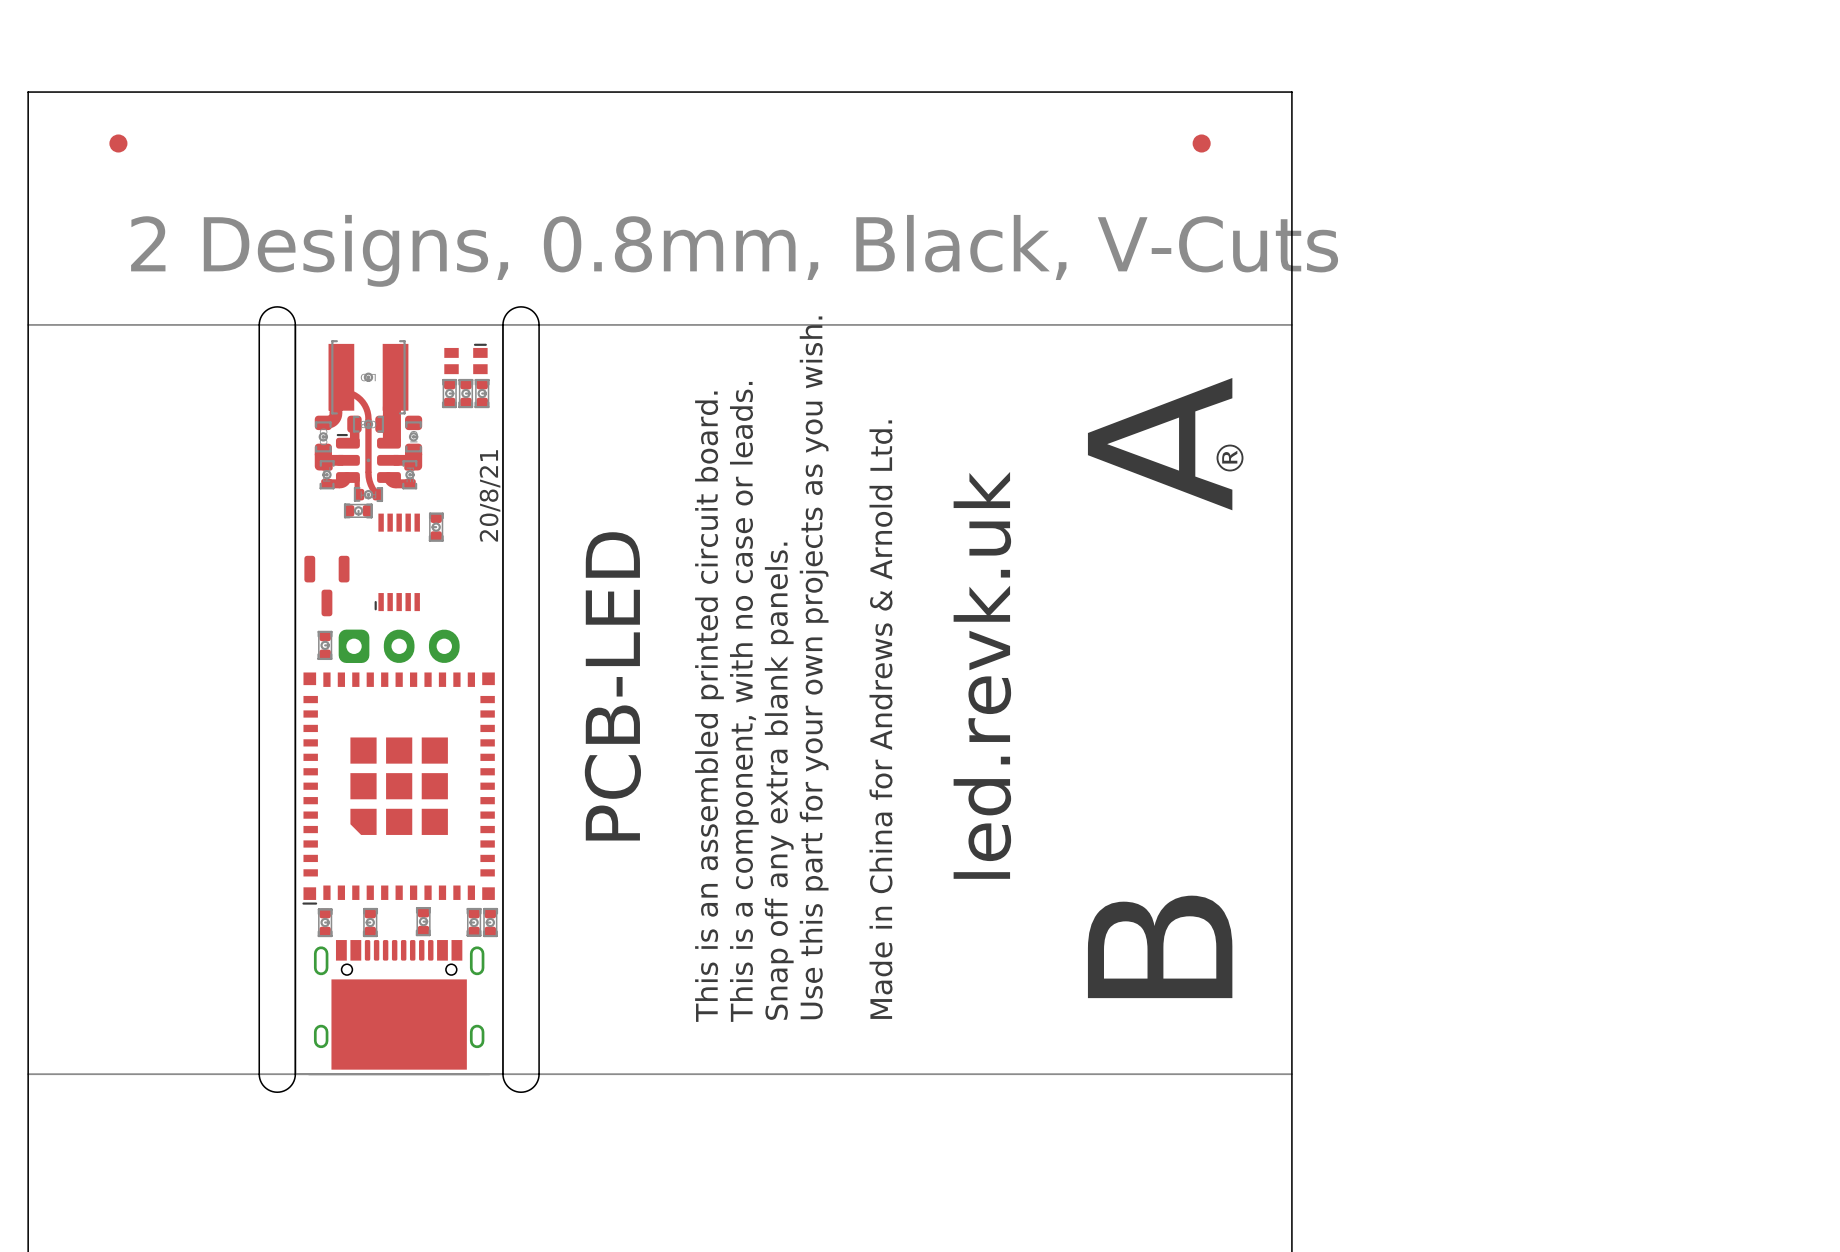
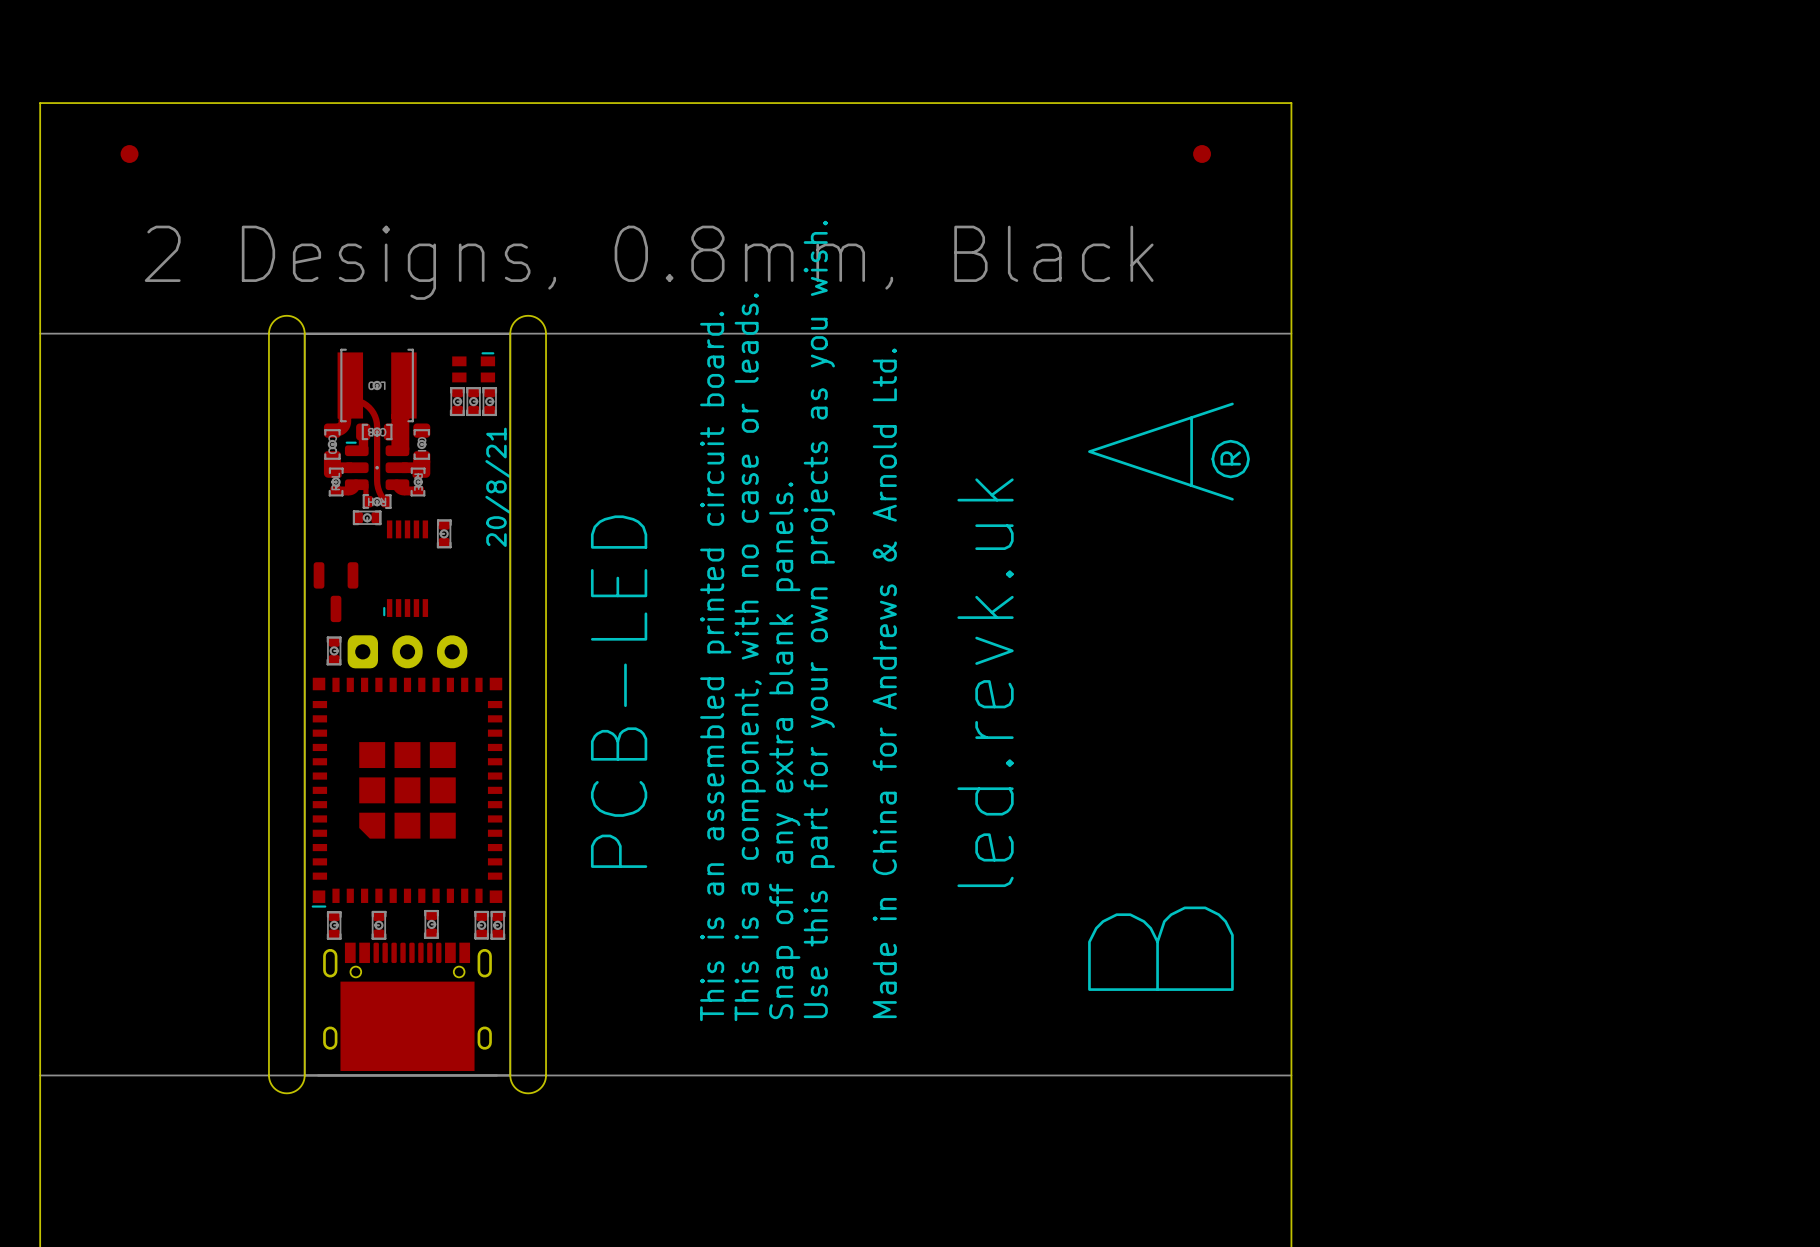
text: 2 Designs, 0.8mm, Black, V-Cuts (734, 250) -> 2 Designs, 0.8mm, Black (649, 262)

